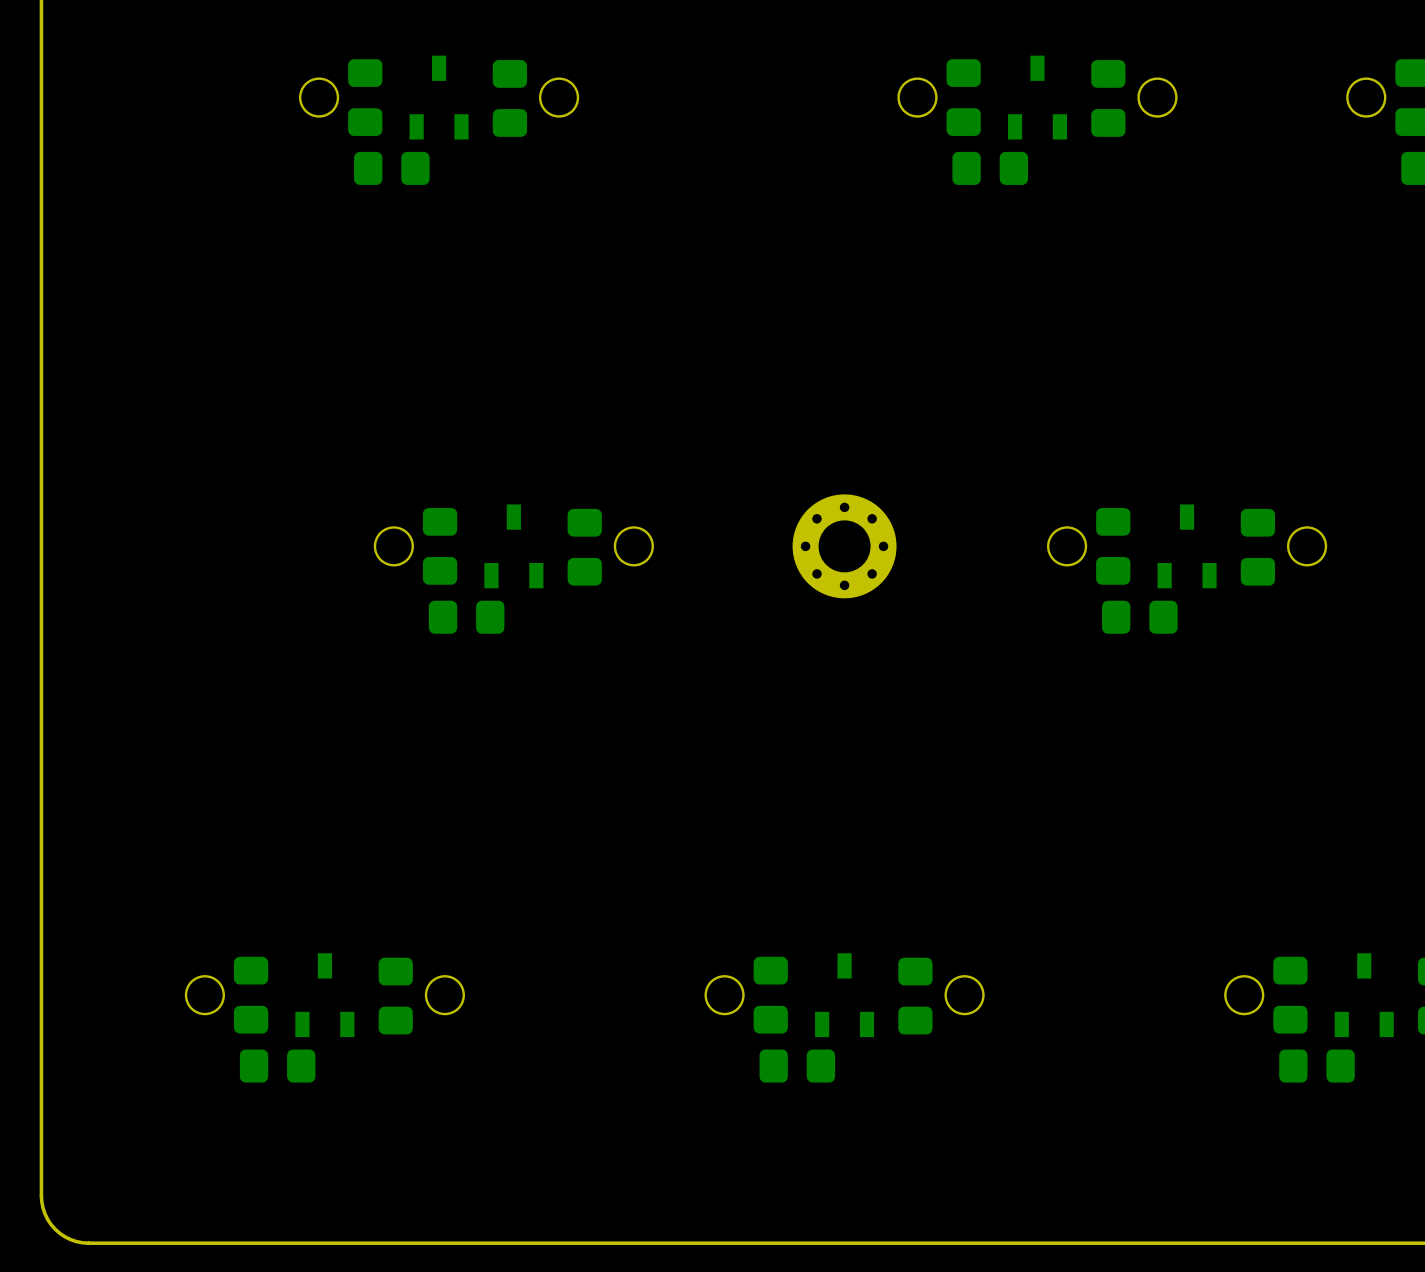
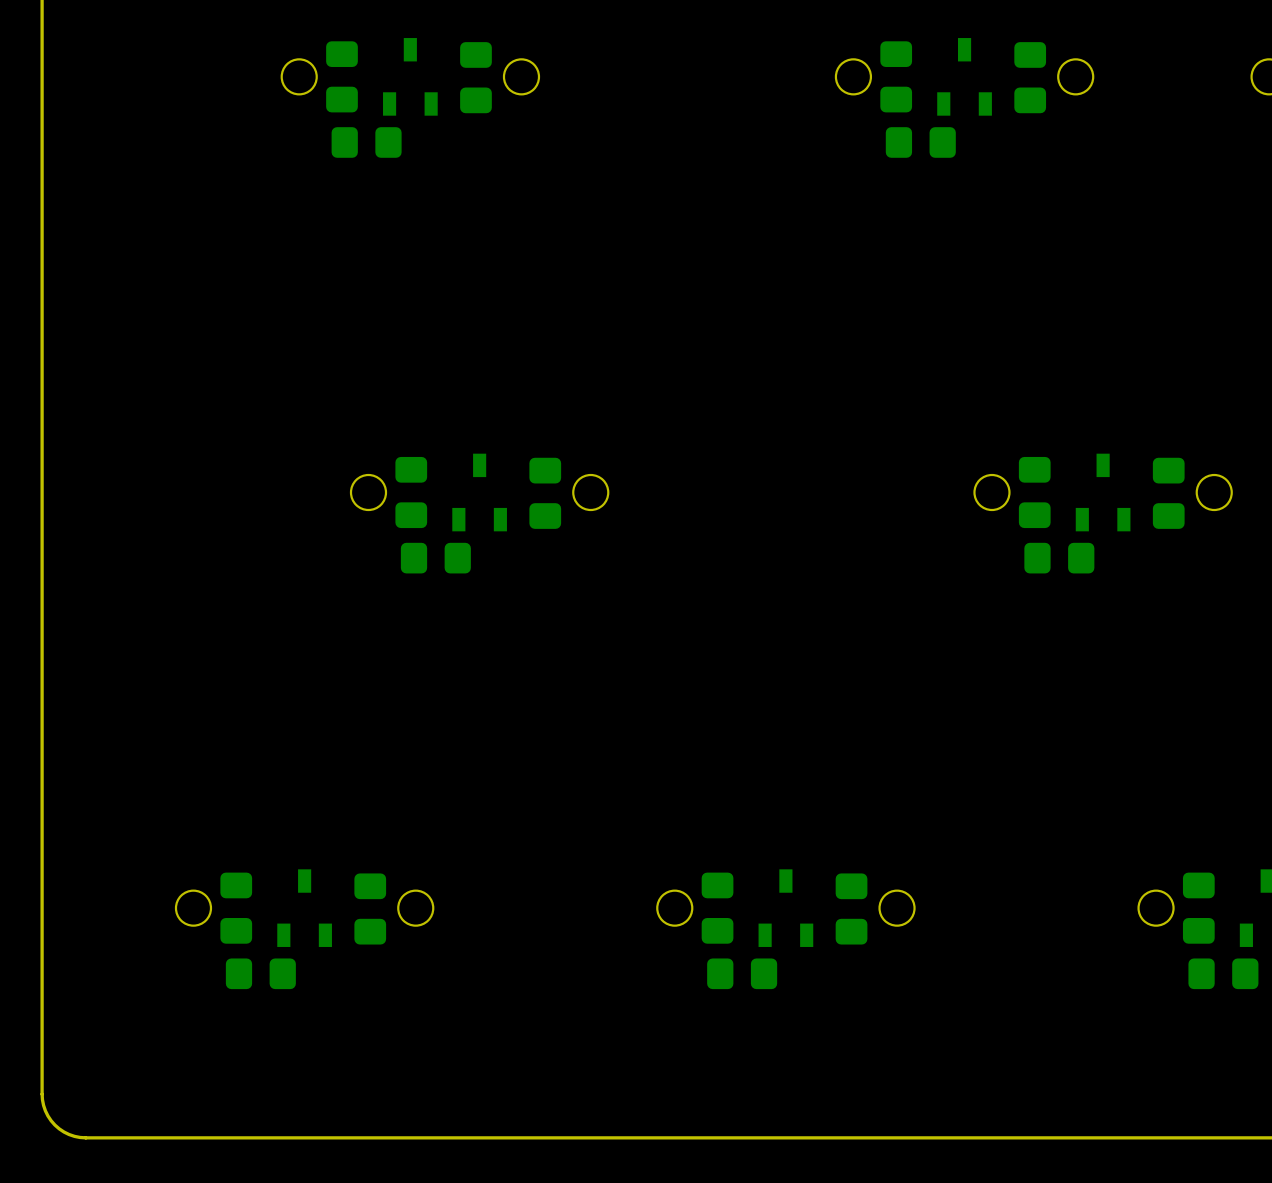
part: (844, 546) -> none

